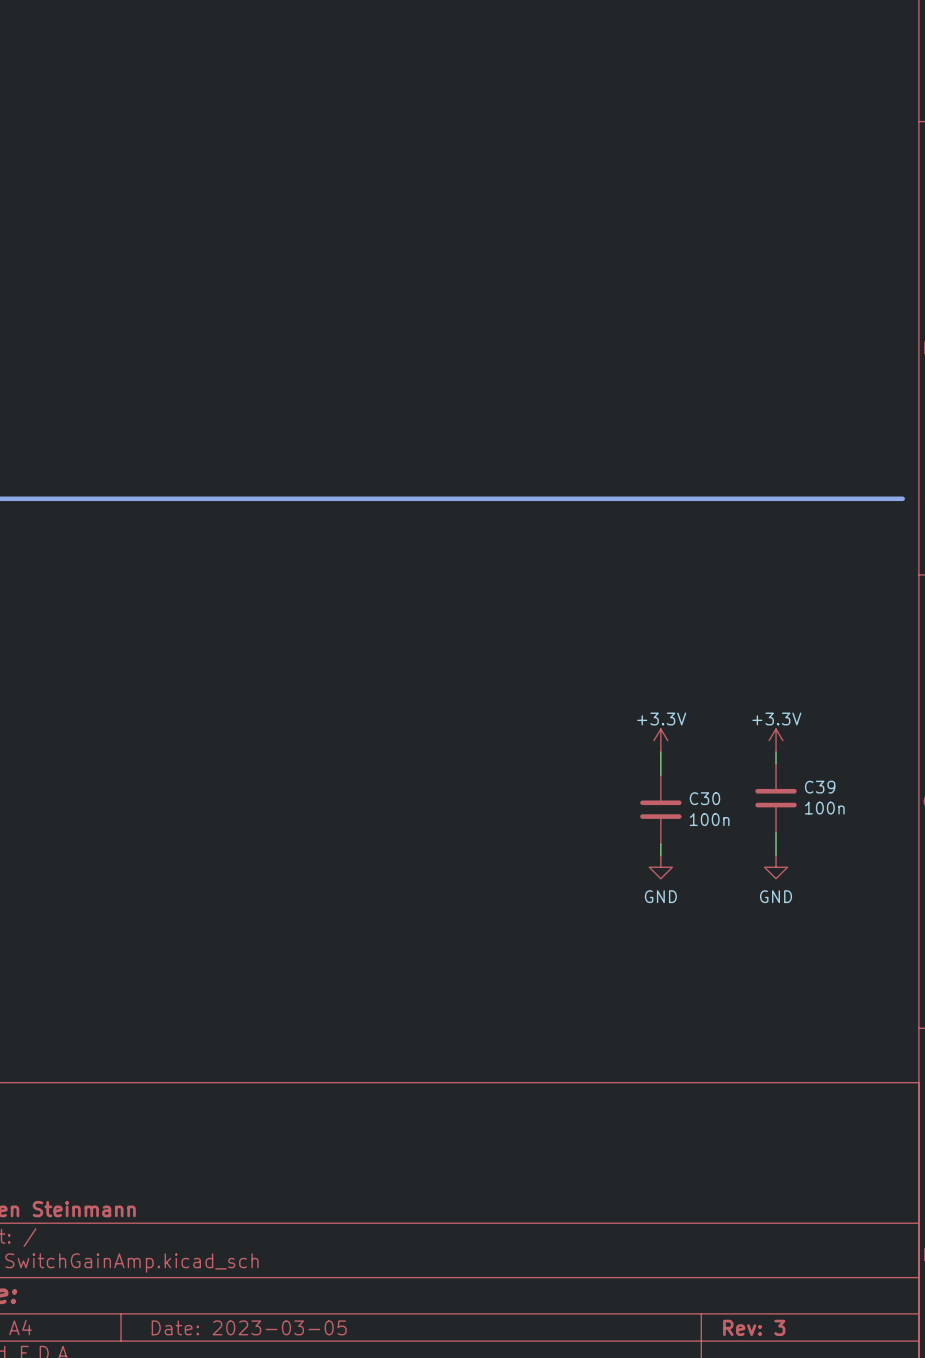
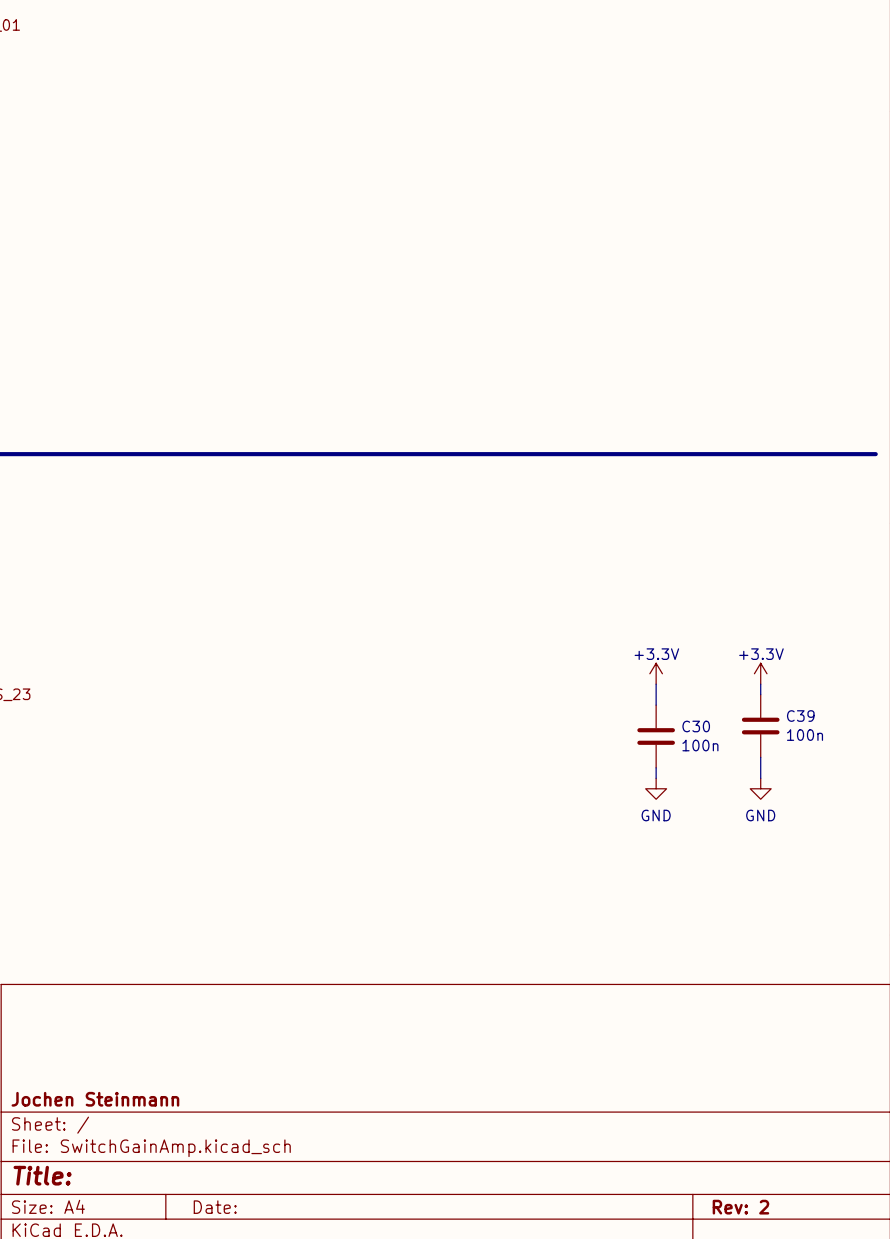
title block: Date: 2023-03-05 (249, 1327) -> Date: (215, 1207)
title block: Rev: 3 (754, 1327) -> Rev: 2 (740, 1207)

